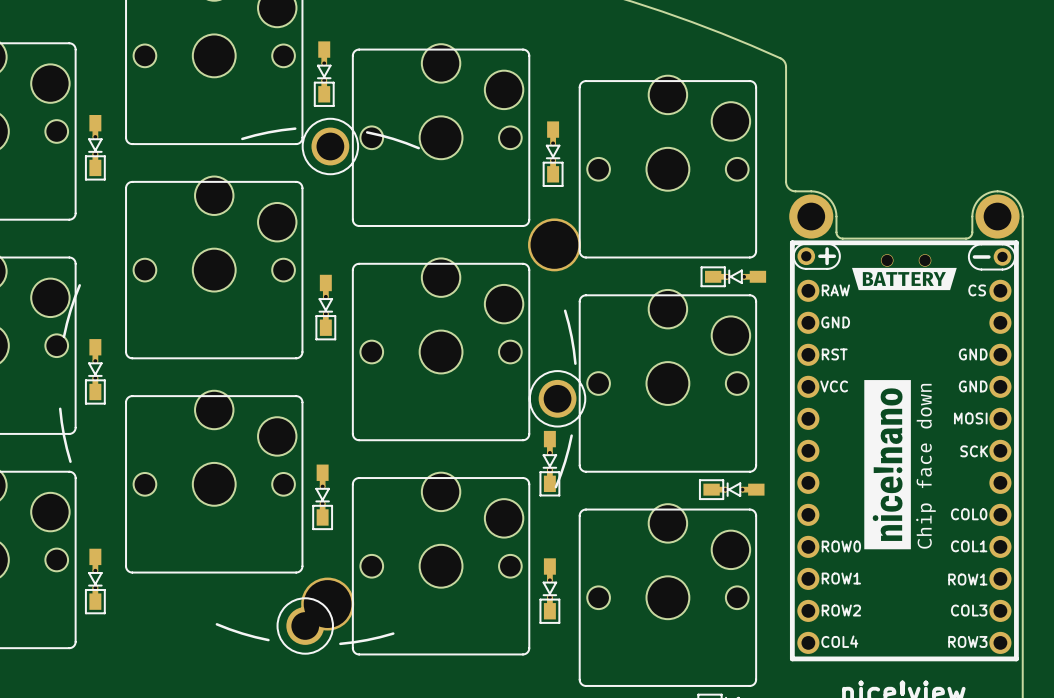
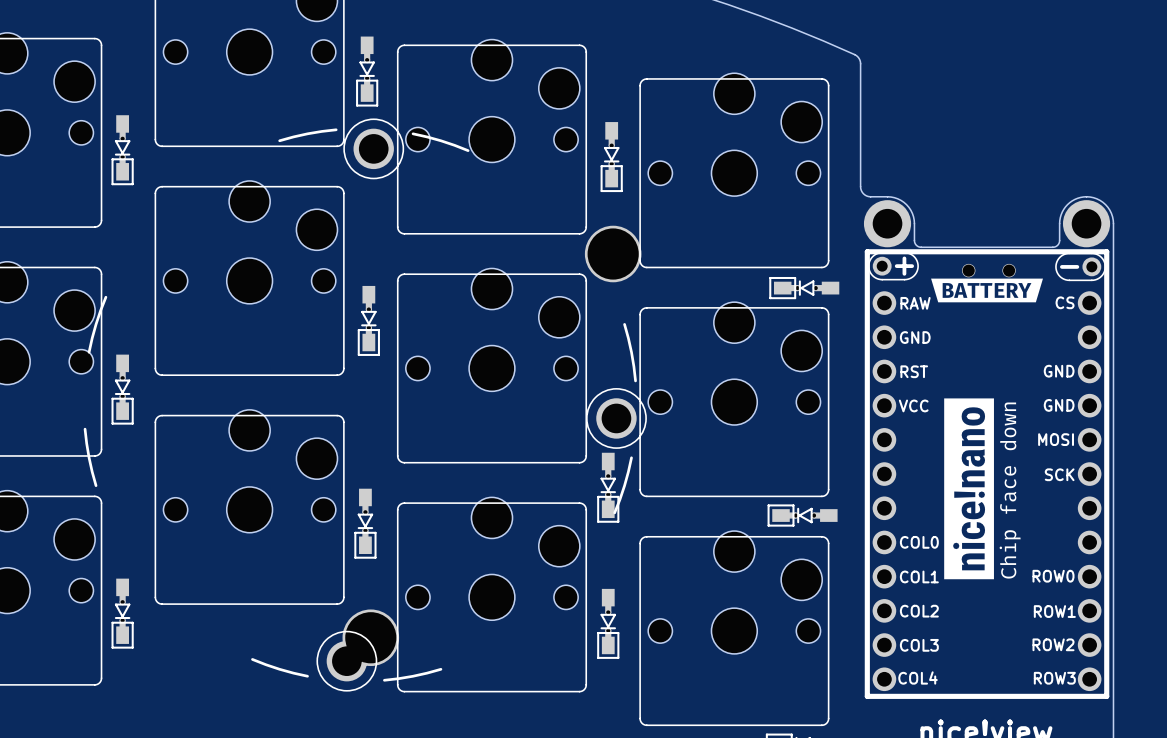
part footprint: [789, 240, 1019, 662] -> [864, 249, 1110, 699]

